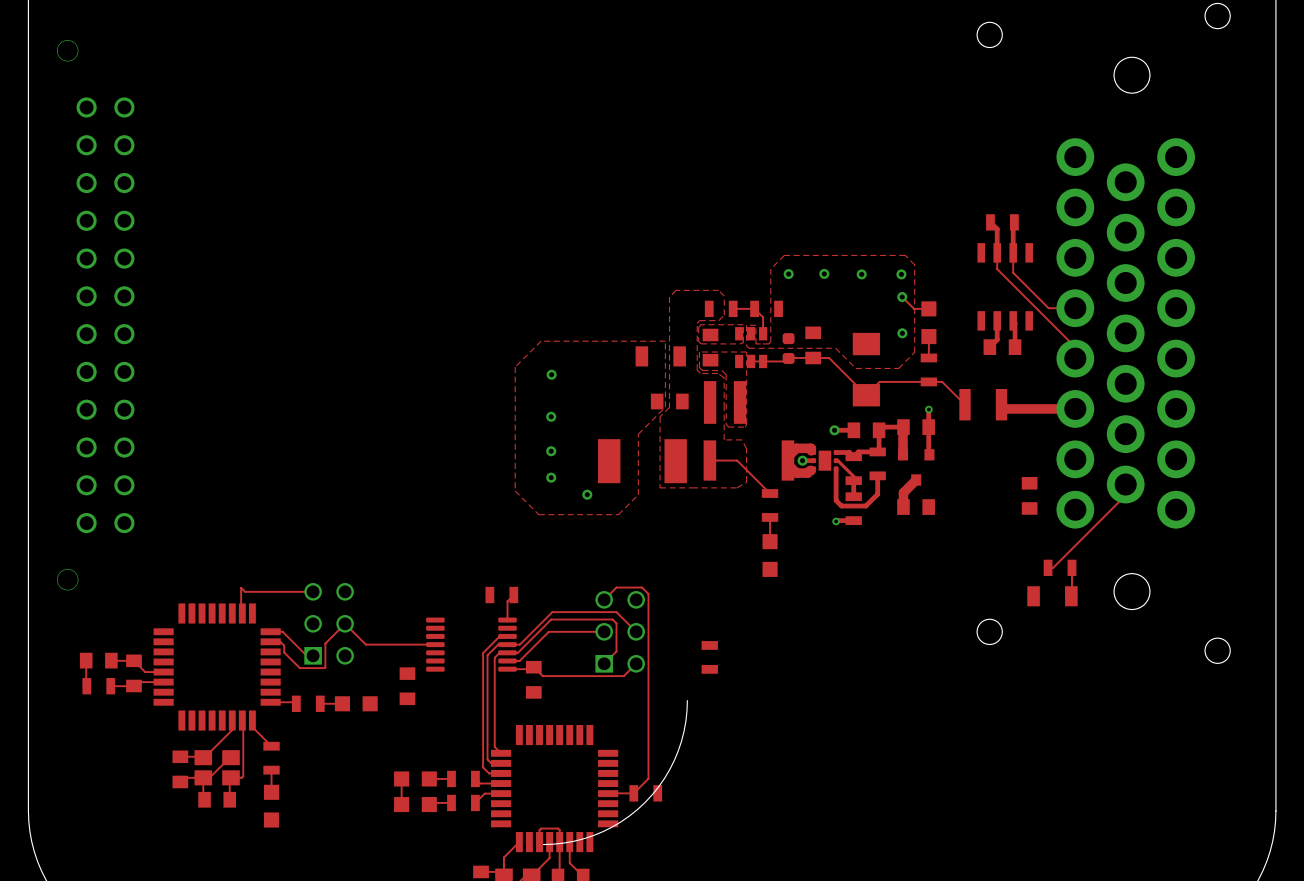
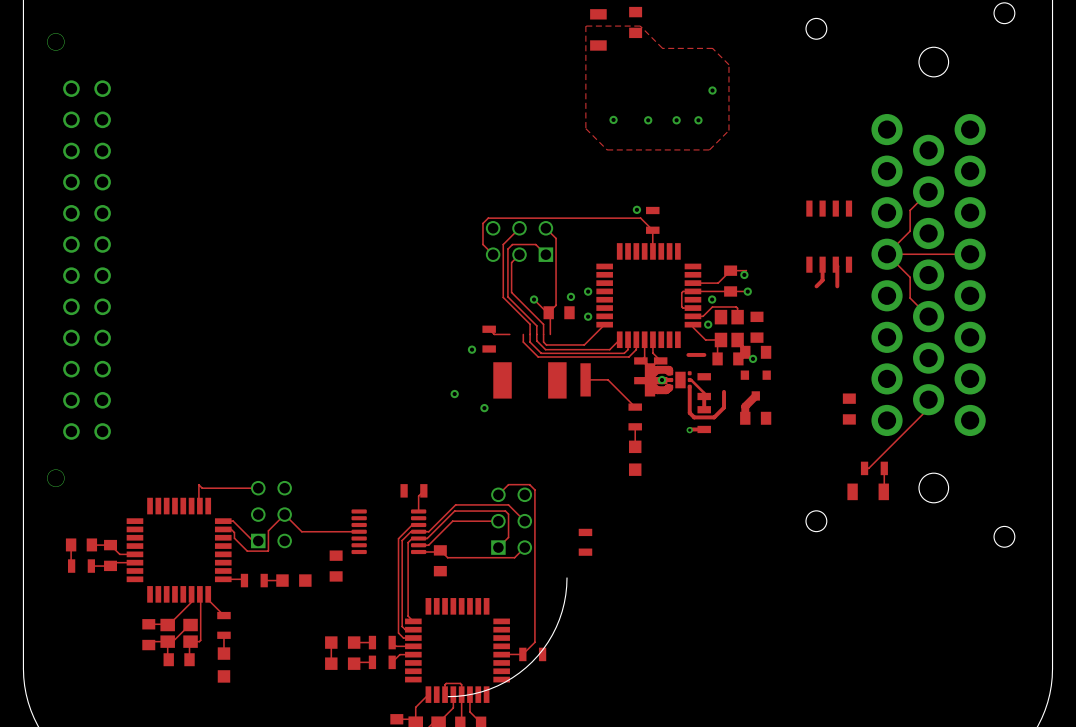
part: none -> (635, 22)
top zone outline: none -> (640, 26) (662, 48) (712, 48) (728, 64) (728, 130) (709, 149) (607, 149) (585, 128) (585, 26) (640, 26)
part: none -> (598, 29)
via: none -> (712, 90)
via: none -> (613, 119)
via: none -> (648, 120)
via: none -> (676, 120)
via: none -> (698, 120)
top track: (990, 222) (997, 229) (997, 269) (1075, 347) -> none
part: (1002, 222) -> none
top track: (1014, 222) (1013, 272) (1048, 308) (1075, 308) -> (928, 191) (910, 210) (910, 231) (887, 254)
top zone outline: (905, 255) (914, 264) (914, 352) (898, 368) (855, 368) (835, 348) (749, 348) (746, 345) (746, 325) (756, 325) (755, 343) (768, 343) (770, 341) (770, 268) (784, 255) (905, 255) -> none
part: none -> (652, 220)
via: (824, 273) -> none
via position: (788, 274) -> (636, 209)
via: (861, 274) -> none
via: (901, 274) -> none
top track: none -> (519, 228) (503, 244) (503, 297) (530, 324) (530, 342) (541, 353) (624, 353) (628, 349) (628, 339)
top track: none -> (545, 228) (556, 238) (556, 305) (548, 312)
top zone outline: (718, 290) (724, 296) (724, 315) (718, 320) (699, 320) (697, 323) (697, 370) (700, 373) (718, 373) (724, 377) (724, 439) (741, 439) (746, 448) (746, 482) (737, 487) (660, 487) (660, 416) (669, 407) (669, 296) (676, 290) (718, 290) -> none
part: none -> (519, 241)
top track: (902, 297) (914, 308) (928, 308) -> none
via: (902, 297) -> none
top track: none -> (652, 251) (652, 230) (640, 218) (488, 218) (482, 223) (482, 244) (493, 254)
top track: none -> (519, 254) (511, 262) (511, 292) (543, 324) (543, 342) (546, 344) (584, 344) (604, 324)
top track: none -> (545, 254) (535, 244) (512, 244) (507, 249) (507, 296) (536, 325) (536, 340) (545, 349) (609, 349) (619, 339)
part: (721, 308) -> none
top track: (733, 308) (754, 308) (763, 317) (763, 333) -> none
part: (766, 308) -> none
top track: none -> (887, 254) (910, 277) (910, 298) (928, 316) (928, 323)
top track: none -> (970, 254) (887, 254)
part: (928, 322) -> none
top zone outline: (743, 324) (700, 324) (698, 327) (698, 341) (701, 343) (740, 343) (743, 342) (743, 324) -> none
top track: none -> (746, 270) (730, 270) (718, 283) (692, 283)
part footprint: [782, 333, 795, 364] -> [596, 243, 702, 349]
top track: (928, 336) (928, 357) -> none
part: none -> (730, 281)
top zone outline: (665, 341) (665, 407) (638, 434) (638, 494) (618, 514) (538, 514) (515, 491) (515, 367) (541, 341) (665, 341) -> none
part: (813, 345) -> none
part: (710, 347) -> none
part: (751, 347) -> none
part: (1002, 347) -> none
top zone outline: (746, 352) (746, 423) (745, 427) (728, 427) (726, 423) (726, 374) (722, 370) (702, 370) (699, 367) (699, 352) (746, 352) -> none
via: none -> (588, 291)
top track: none -> (747, 291) (683, 291) (681, 306) (692, 308)
via: none -> (747, 291)
part: (660, 356) -> none
via: none -> (570, 296)
top track: (751, 361) (785, 361) (789, 357) (829, 357) (866, 395) (879, 381) (942, 381) (965, 404) -> none
top track: none -> (534, 299) (548, 312)
via: none -> (534, 299)
via: none -> (712, 299)
part: (866, 369) -> none
part: (928, 369) -> none
via: (551, 374) -> none
top track: none -> (548, 312) (550, 334)
part: none -> (559, 312)
via: none -> (588, 316)
top track: none -> (692, 316) (703, 316) (712, 306) (736, 306) (737, 317)
via: none -> (708, 324)
top track: none -> (692, 327) (705, 339) (720, 339) (717, 343) (717, 358)
part: none -> (756, 327)
part: none -> (729, 328)
top track: none -> (489, 329) (494, 334) (509, 334)
part: (669, 401) -> none
part: (725, 402) -> none
part: (983, 404) -> none
top track: (1001, 404) (1005, 408) (1075, 408) -> none
top track: none -> (523, 334) (523, 342) (538, 356) (628, 356) (636, 349) (636, 339)
top track: (928, 409) (929, 454) -> none
via: (928, 409) -> none
part: none -> (489, 339)
top track: none -> (644, 339) (644, 357) (640, 360)
top track: none -> (652, 339) (652, 353) (660, 360)
via: (551, 416) -> none
via: none -> (472, 349)
via: (834, 430) -> none
part position: (866, 430) -> (727, 358)
via: none -> (753, 358)
part: none -> (640, 370)
part: none -> (660, 370)
via: (551, 451) -> none
top track: (836, 452) (849, 452) (853, 456) (858, 451) (877, 451) (879, 430) (882, 427) (903, 427) (903, 454) -> none
part: (877, 463) -> none

